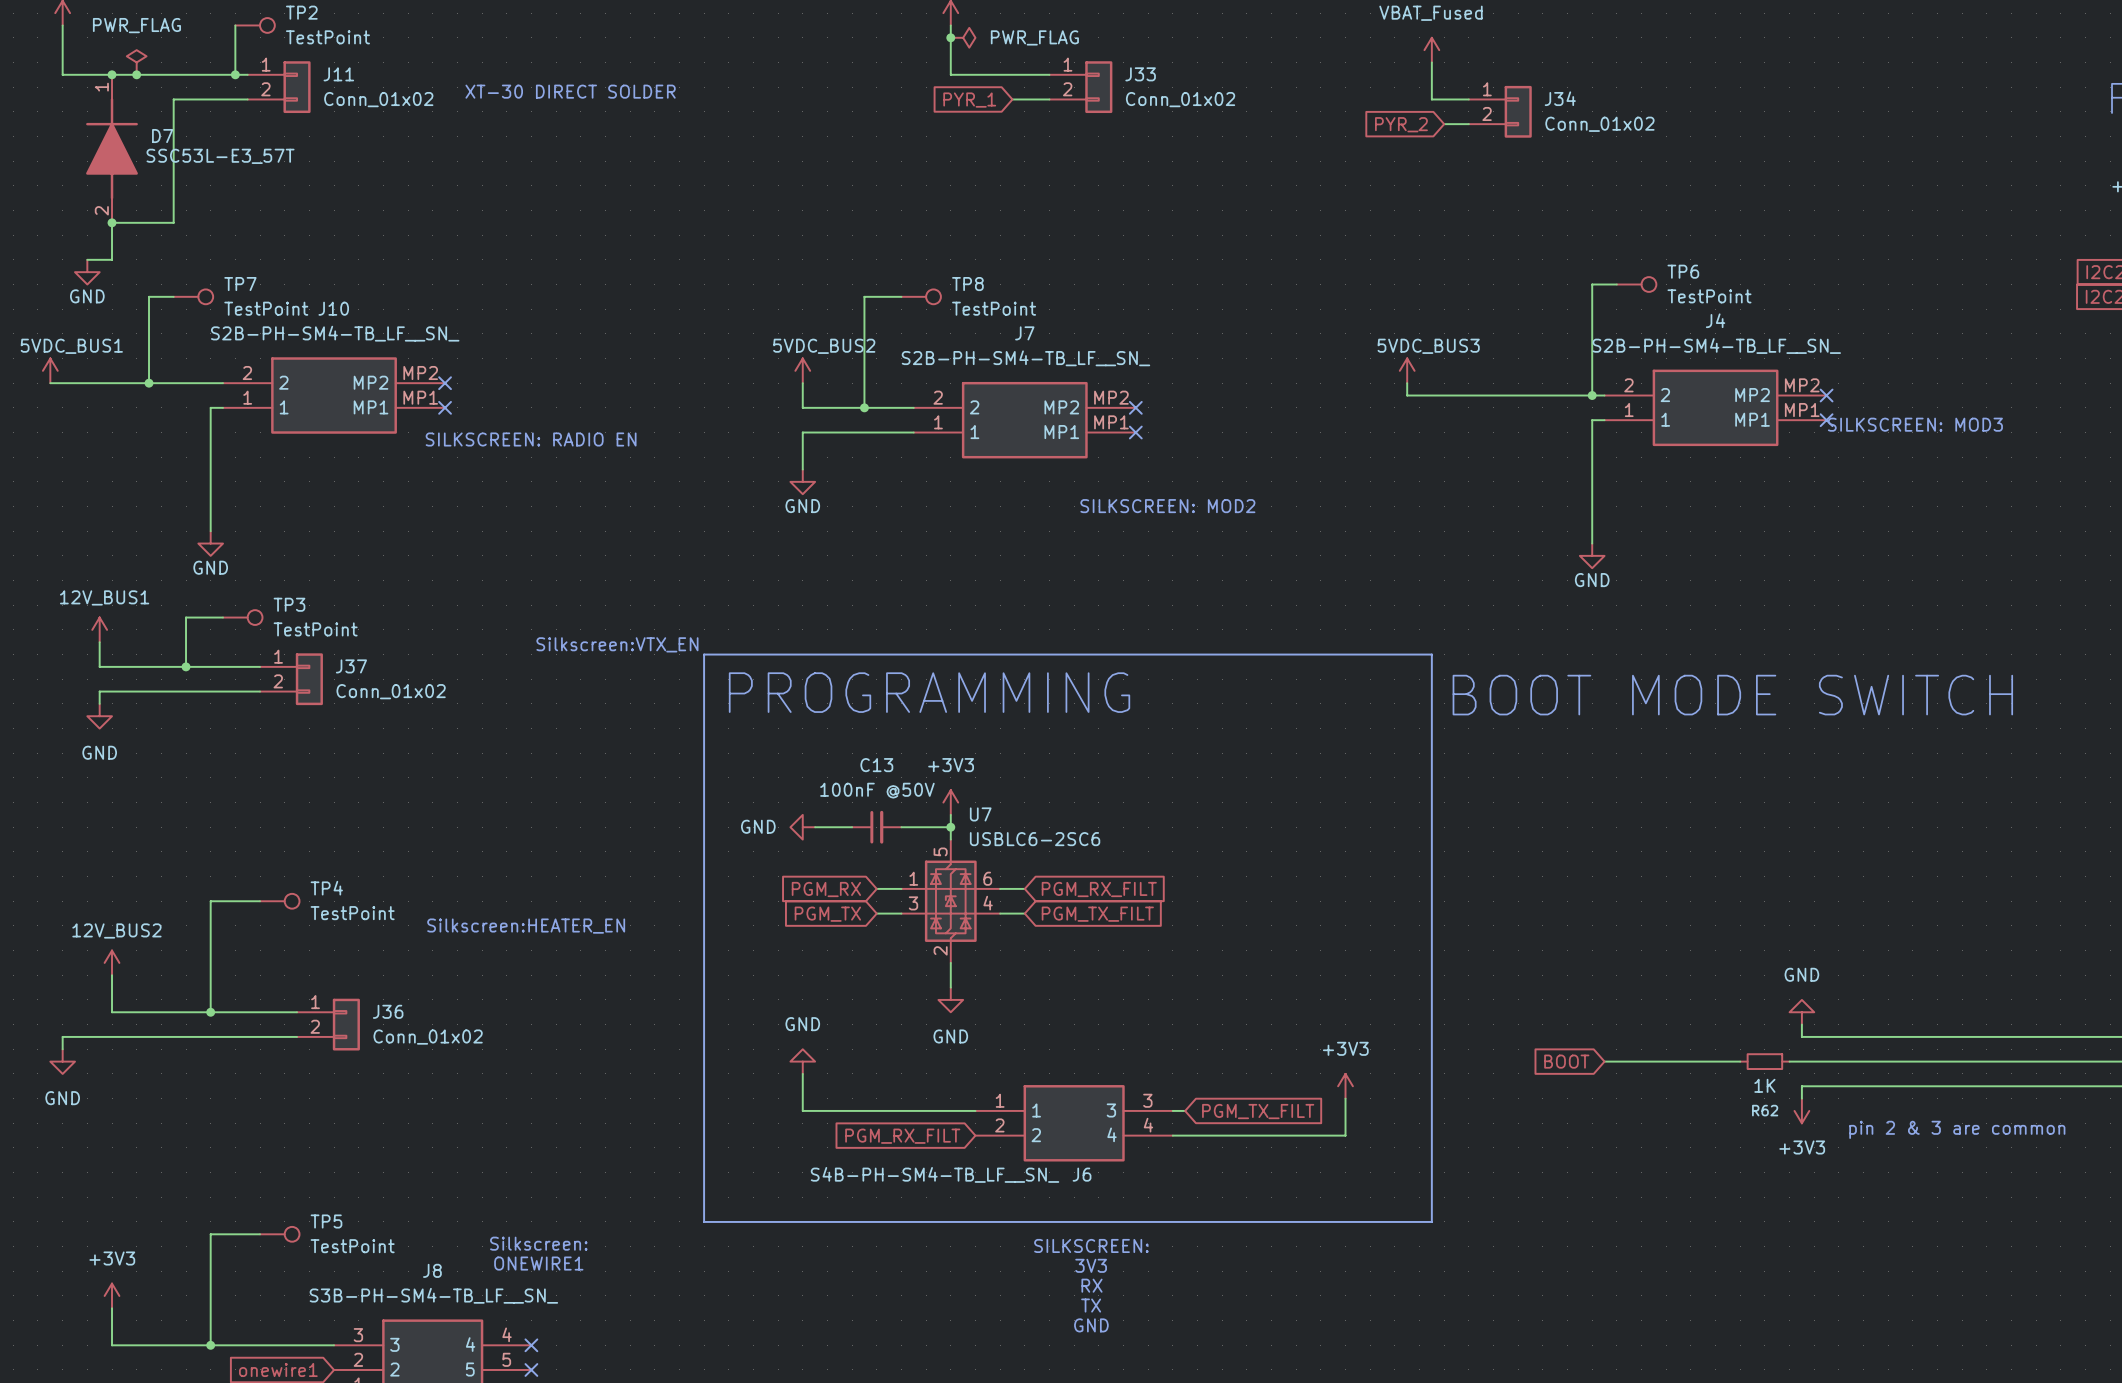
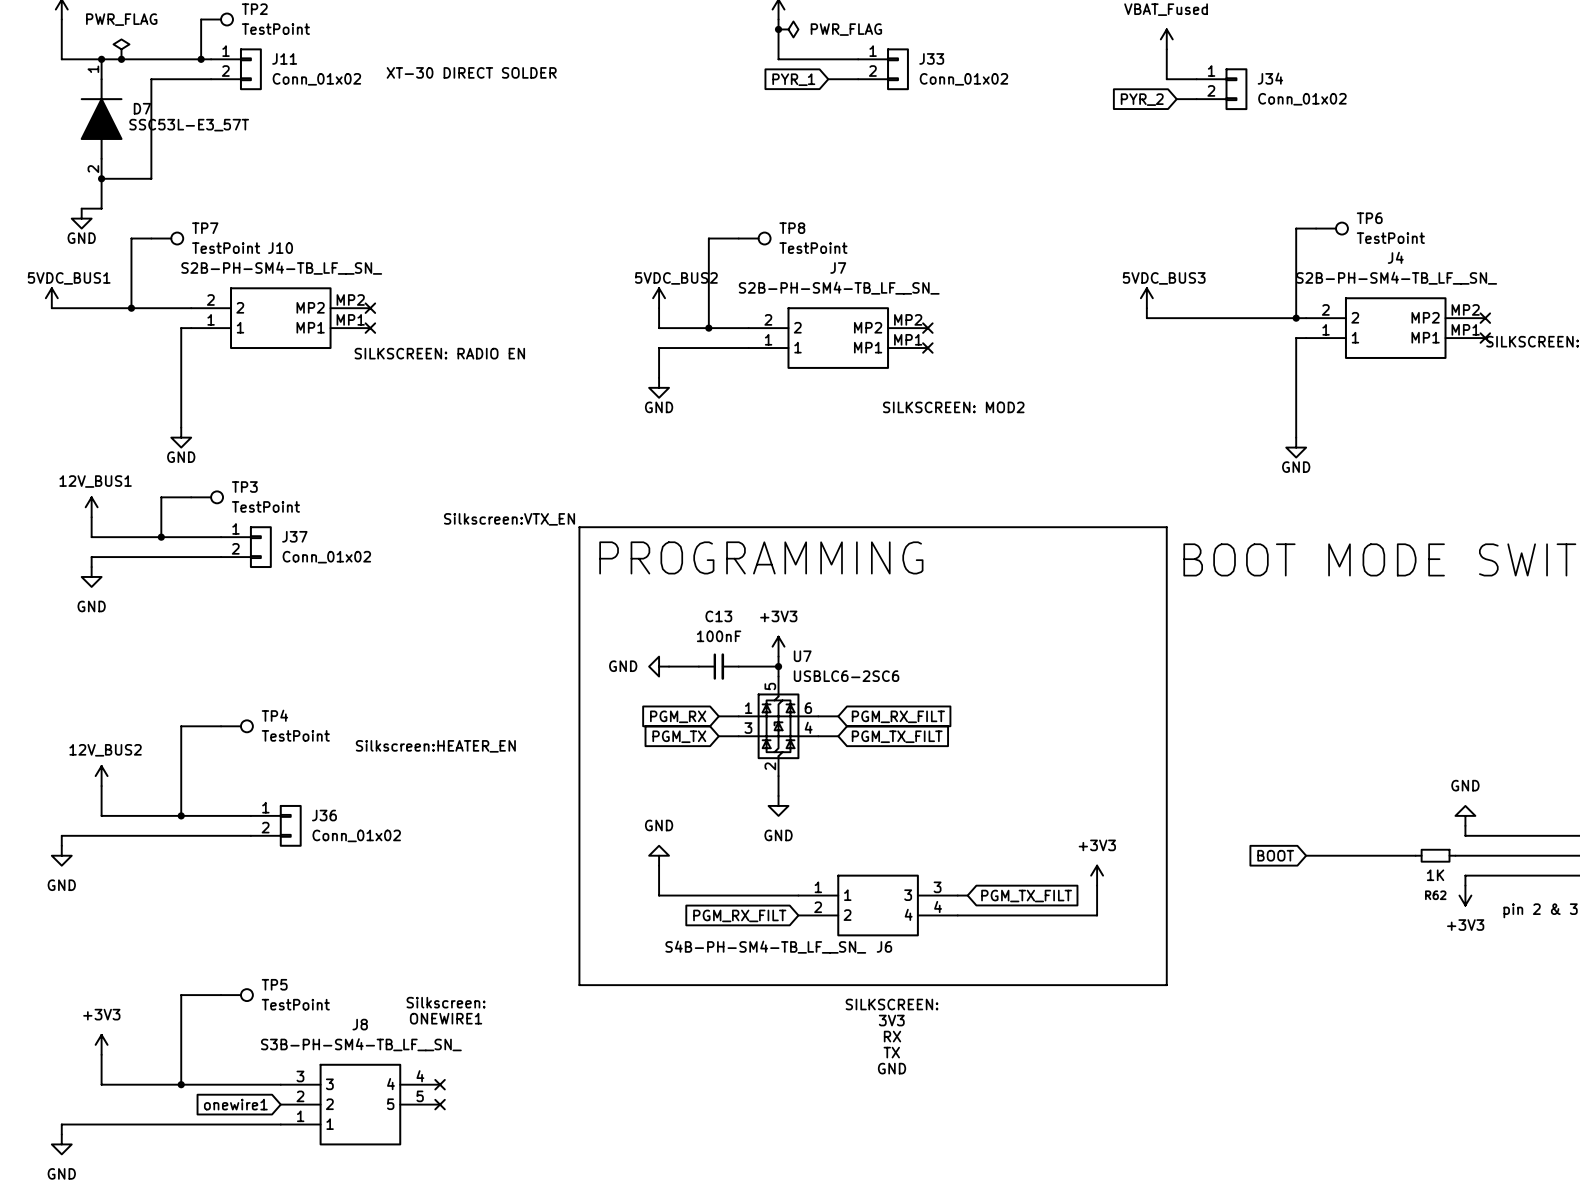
C13 value: 100nF @50V (877, 790) -> 100nF (719, 636)

